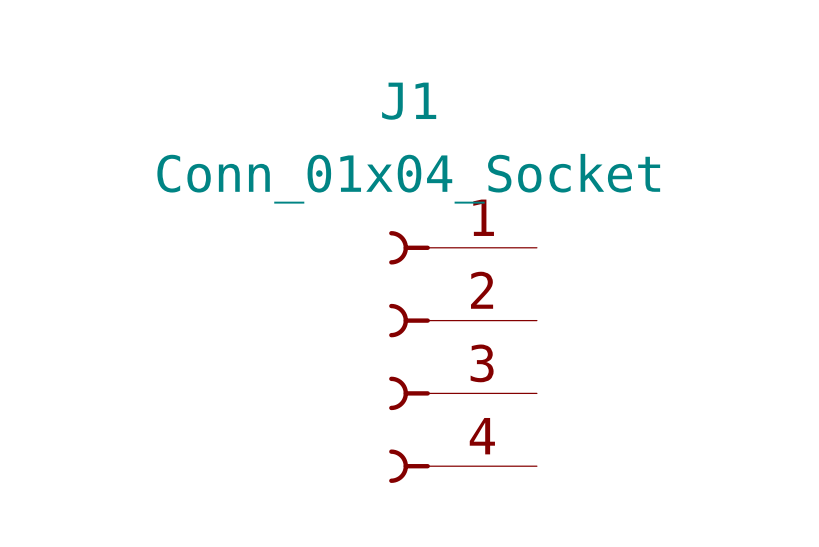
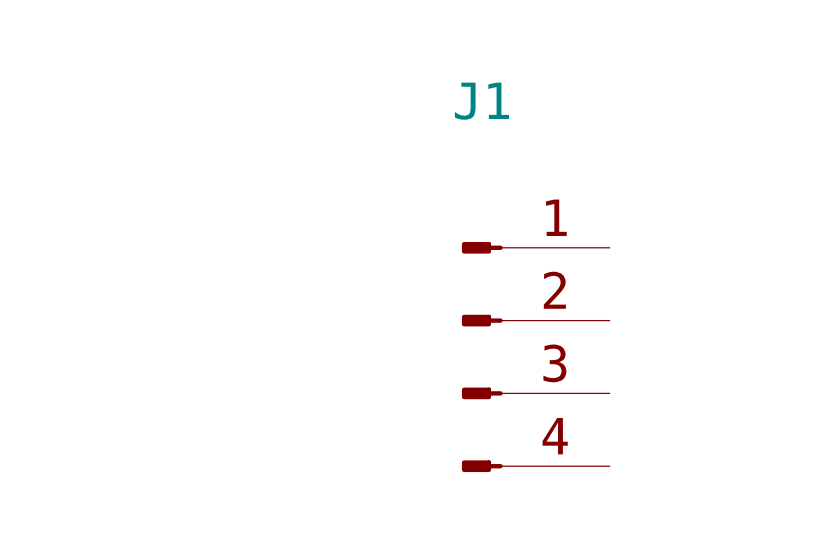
J1 value: Conn_01x04_Socket (408, 178) -> none
J1 symbol: [389, 231, 537, 483] -> [461, 241, 610, 473]

